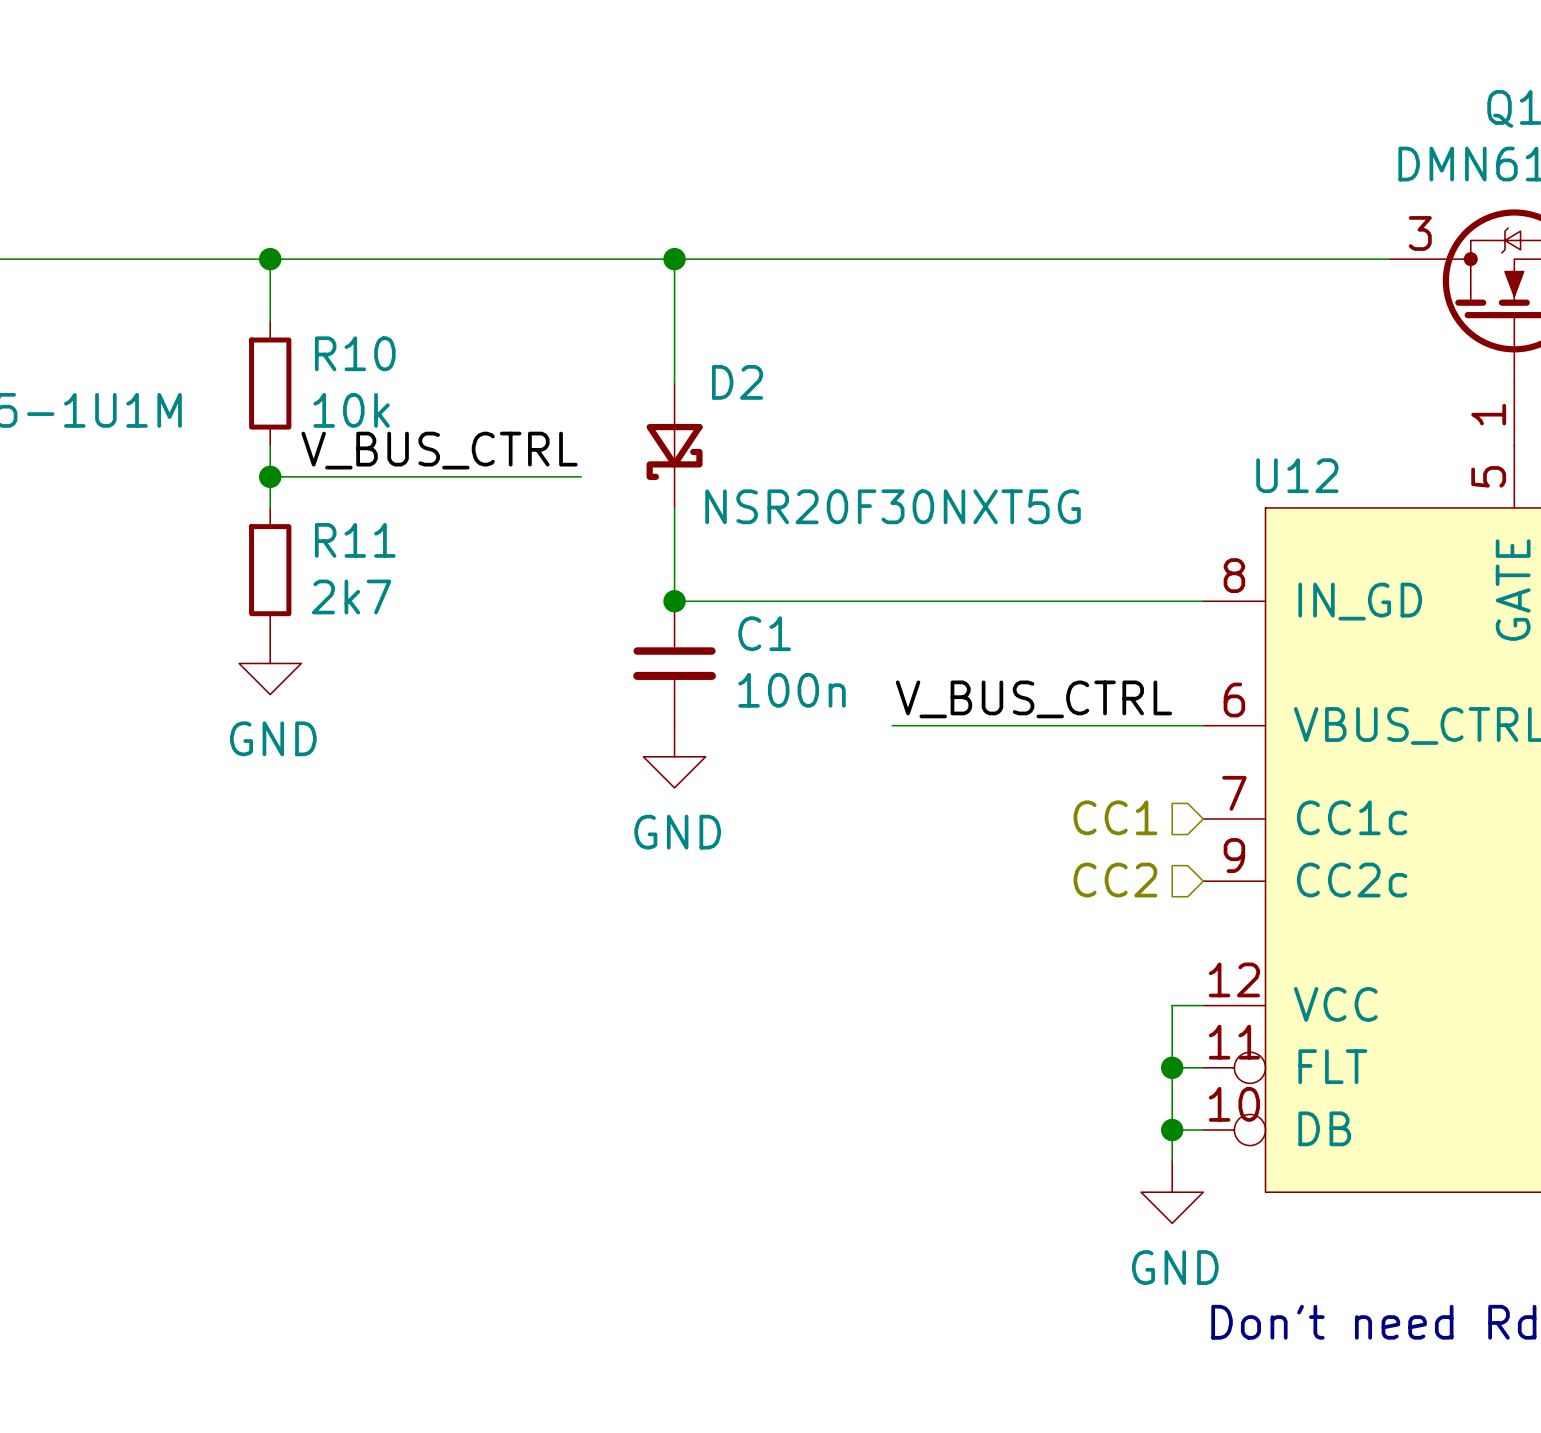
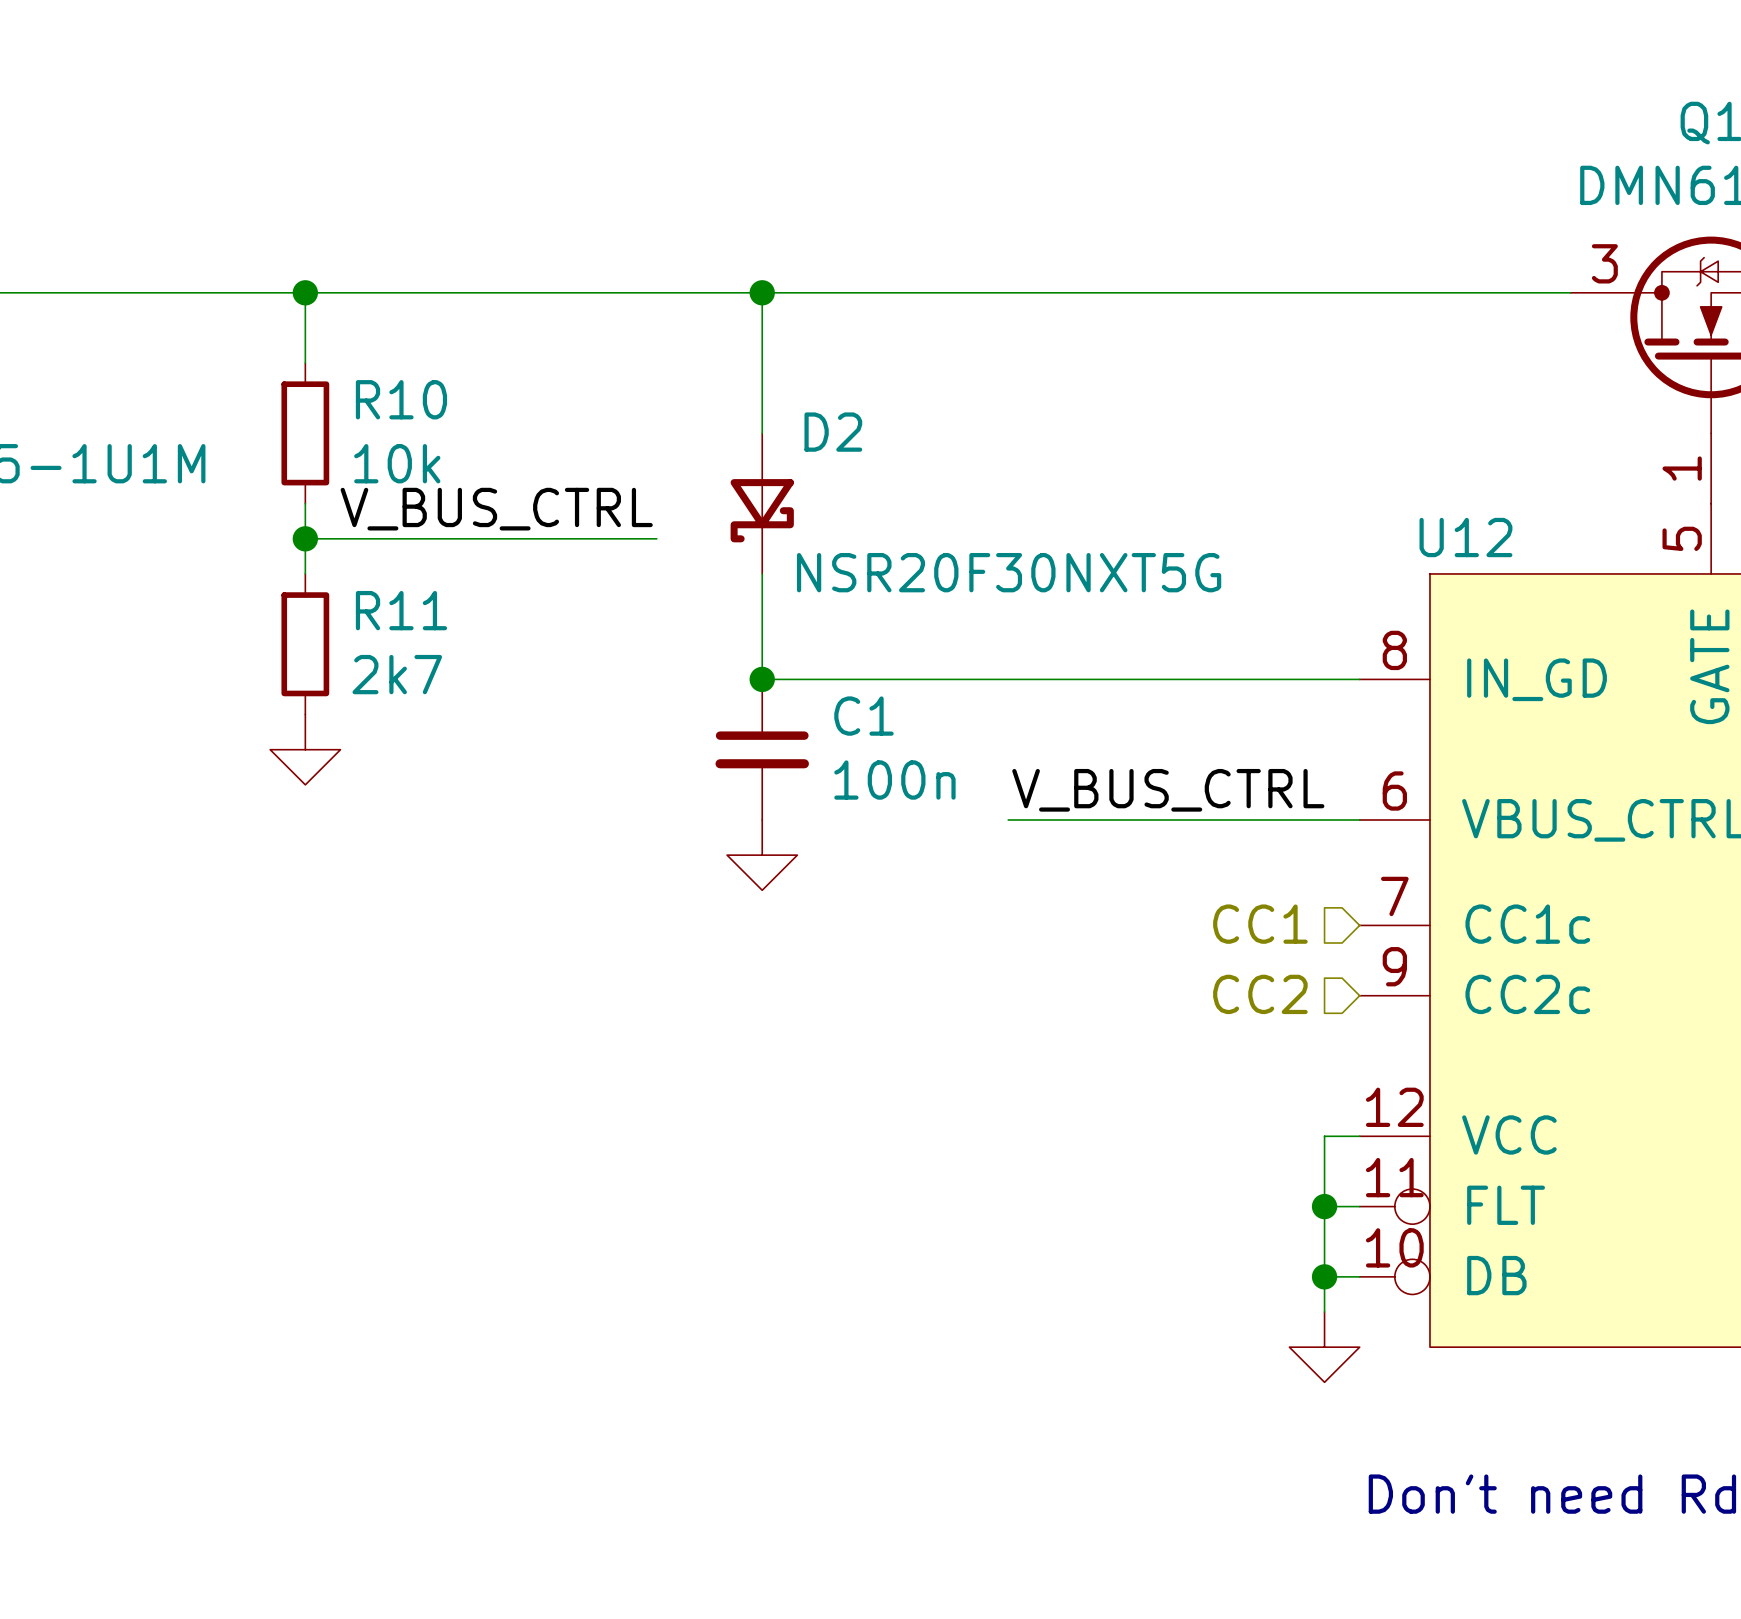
power symbol text: GND (273, 738) -> none
power symbol text: GND (677, 832) -> none
power symbol text: GND (1175, 1267) -> none

